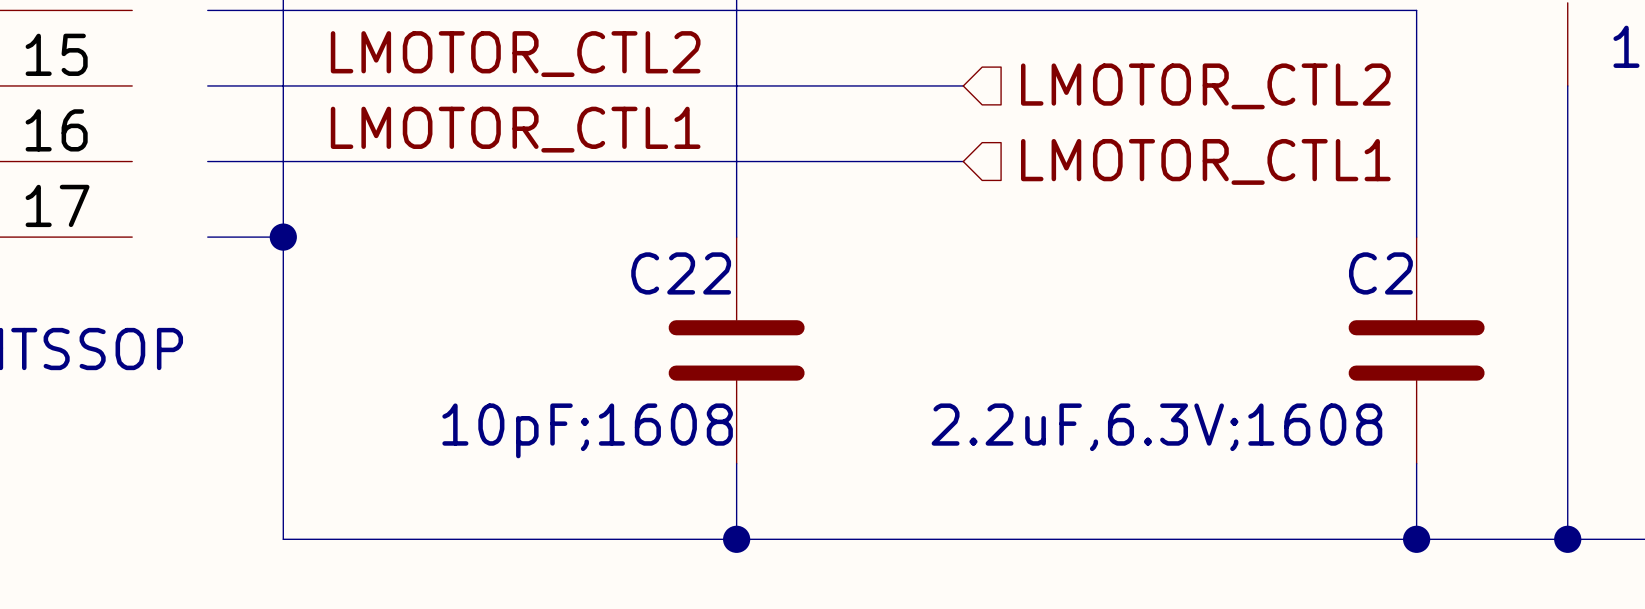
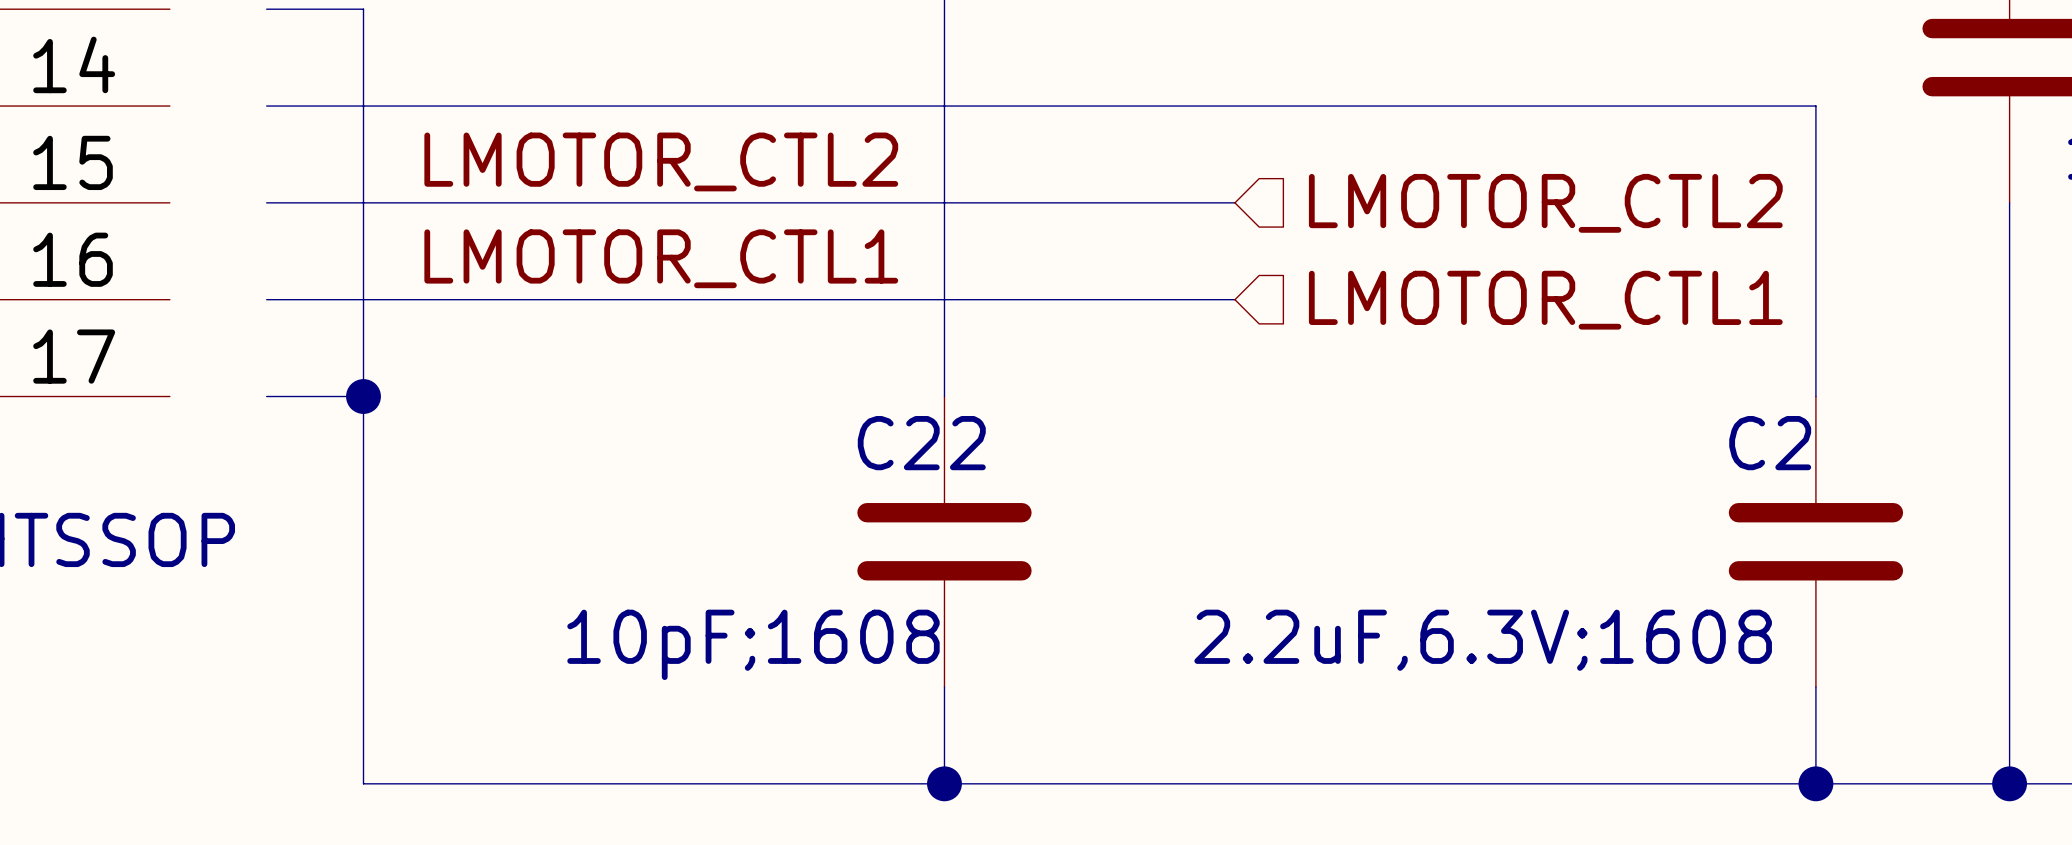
C22 name position: C22 (681, 273) -> C22 (921, 443)

